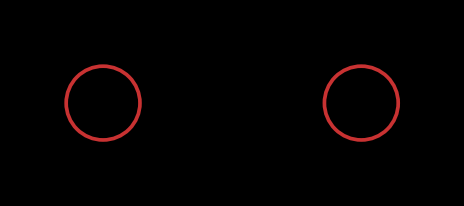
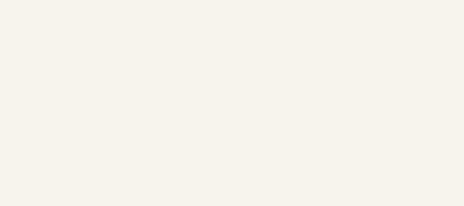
part: (103, 103) -> none
part: (361, 103) -> none

